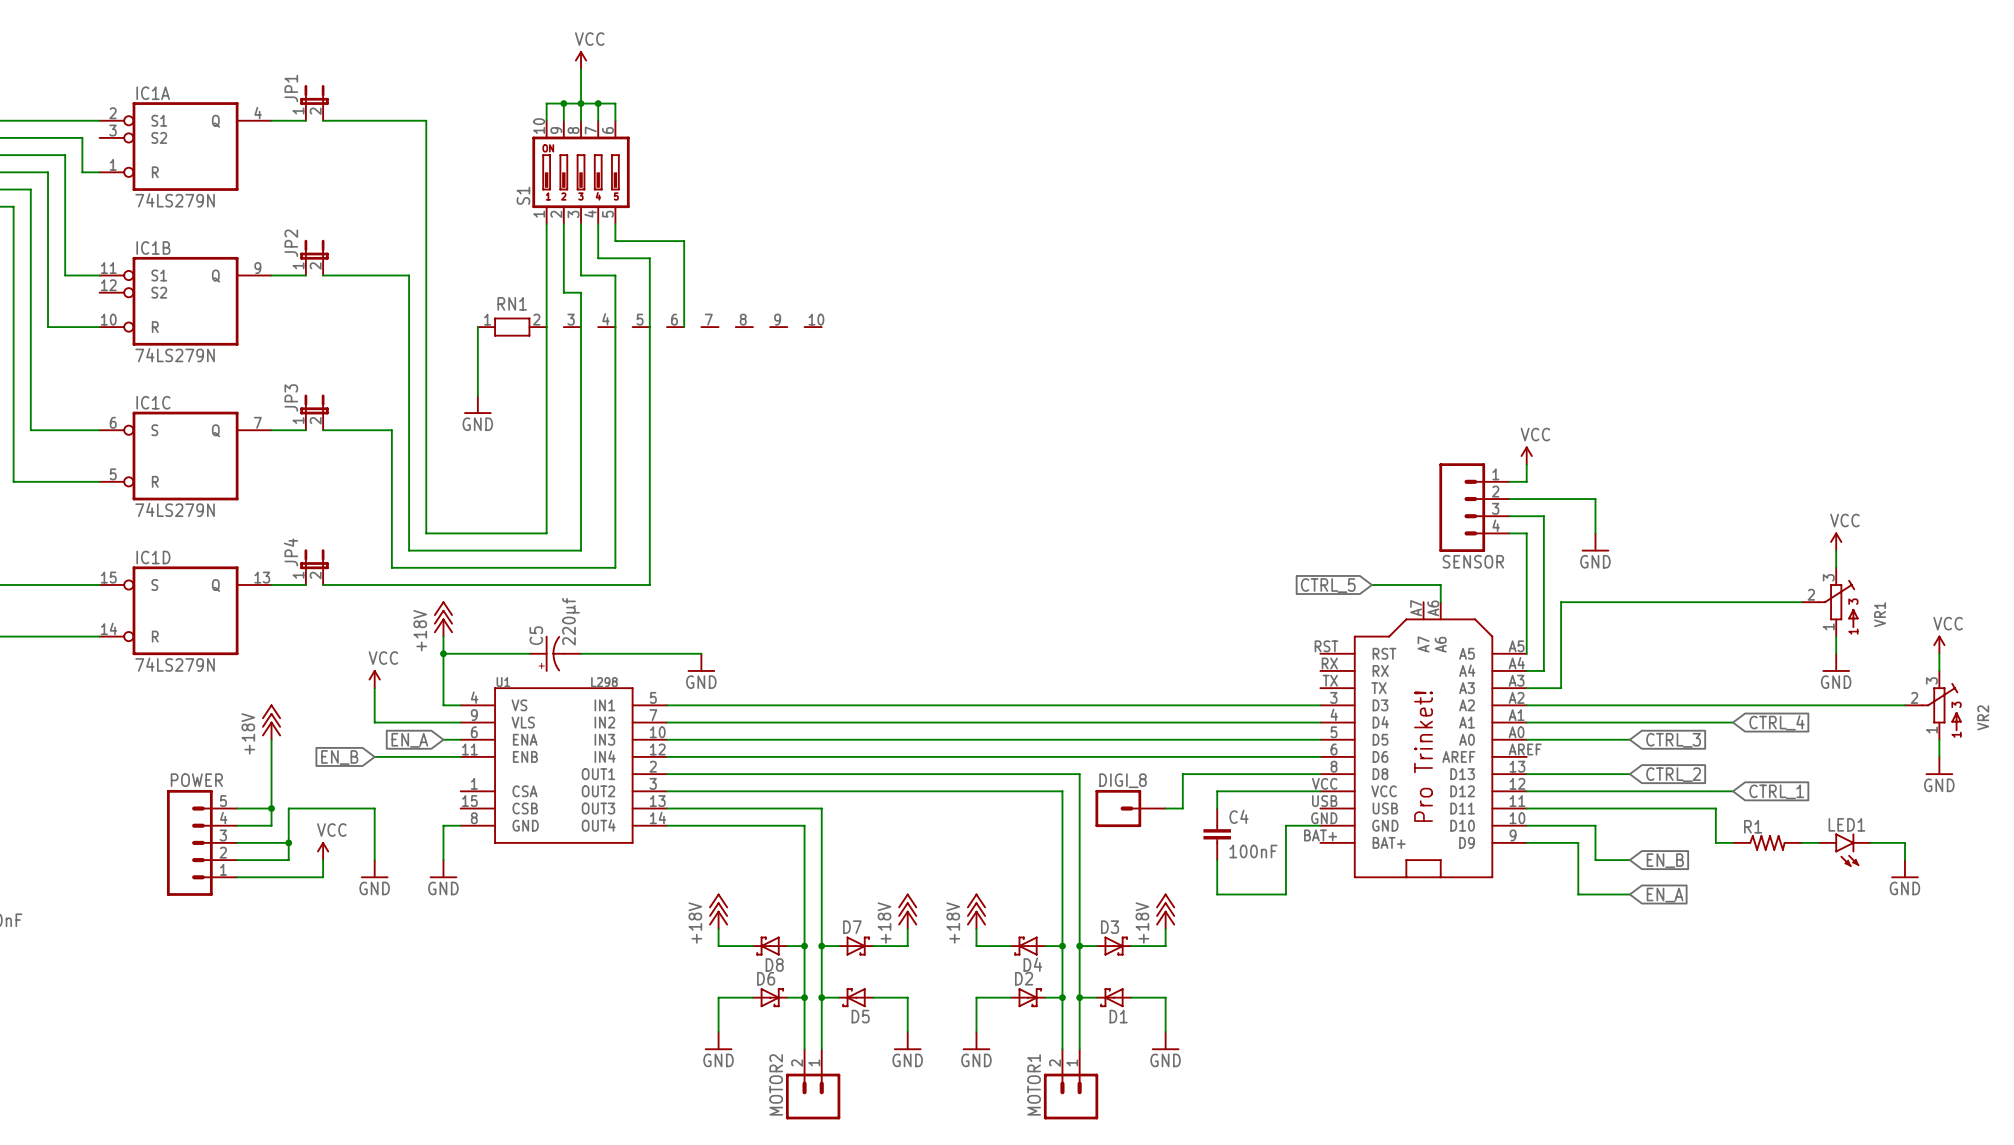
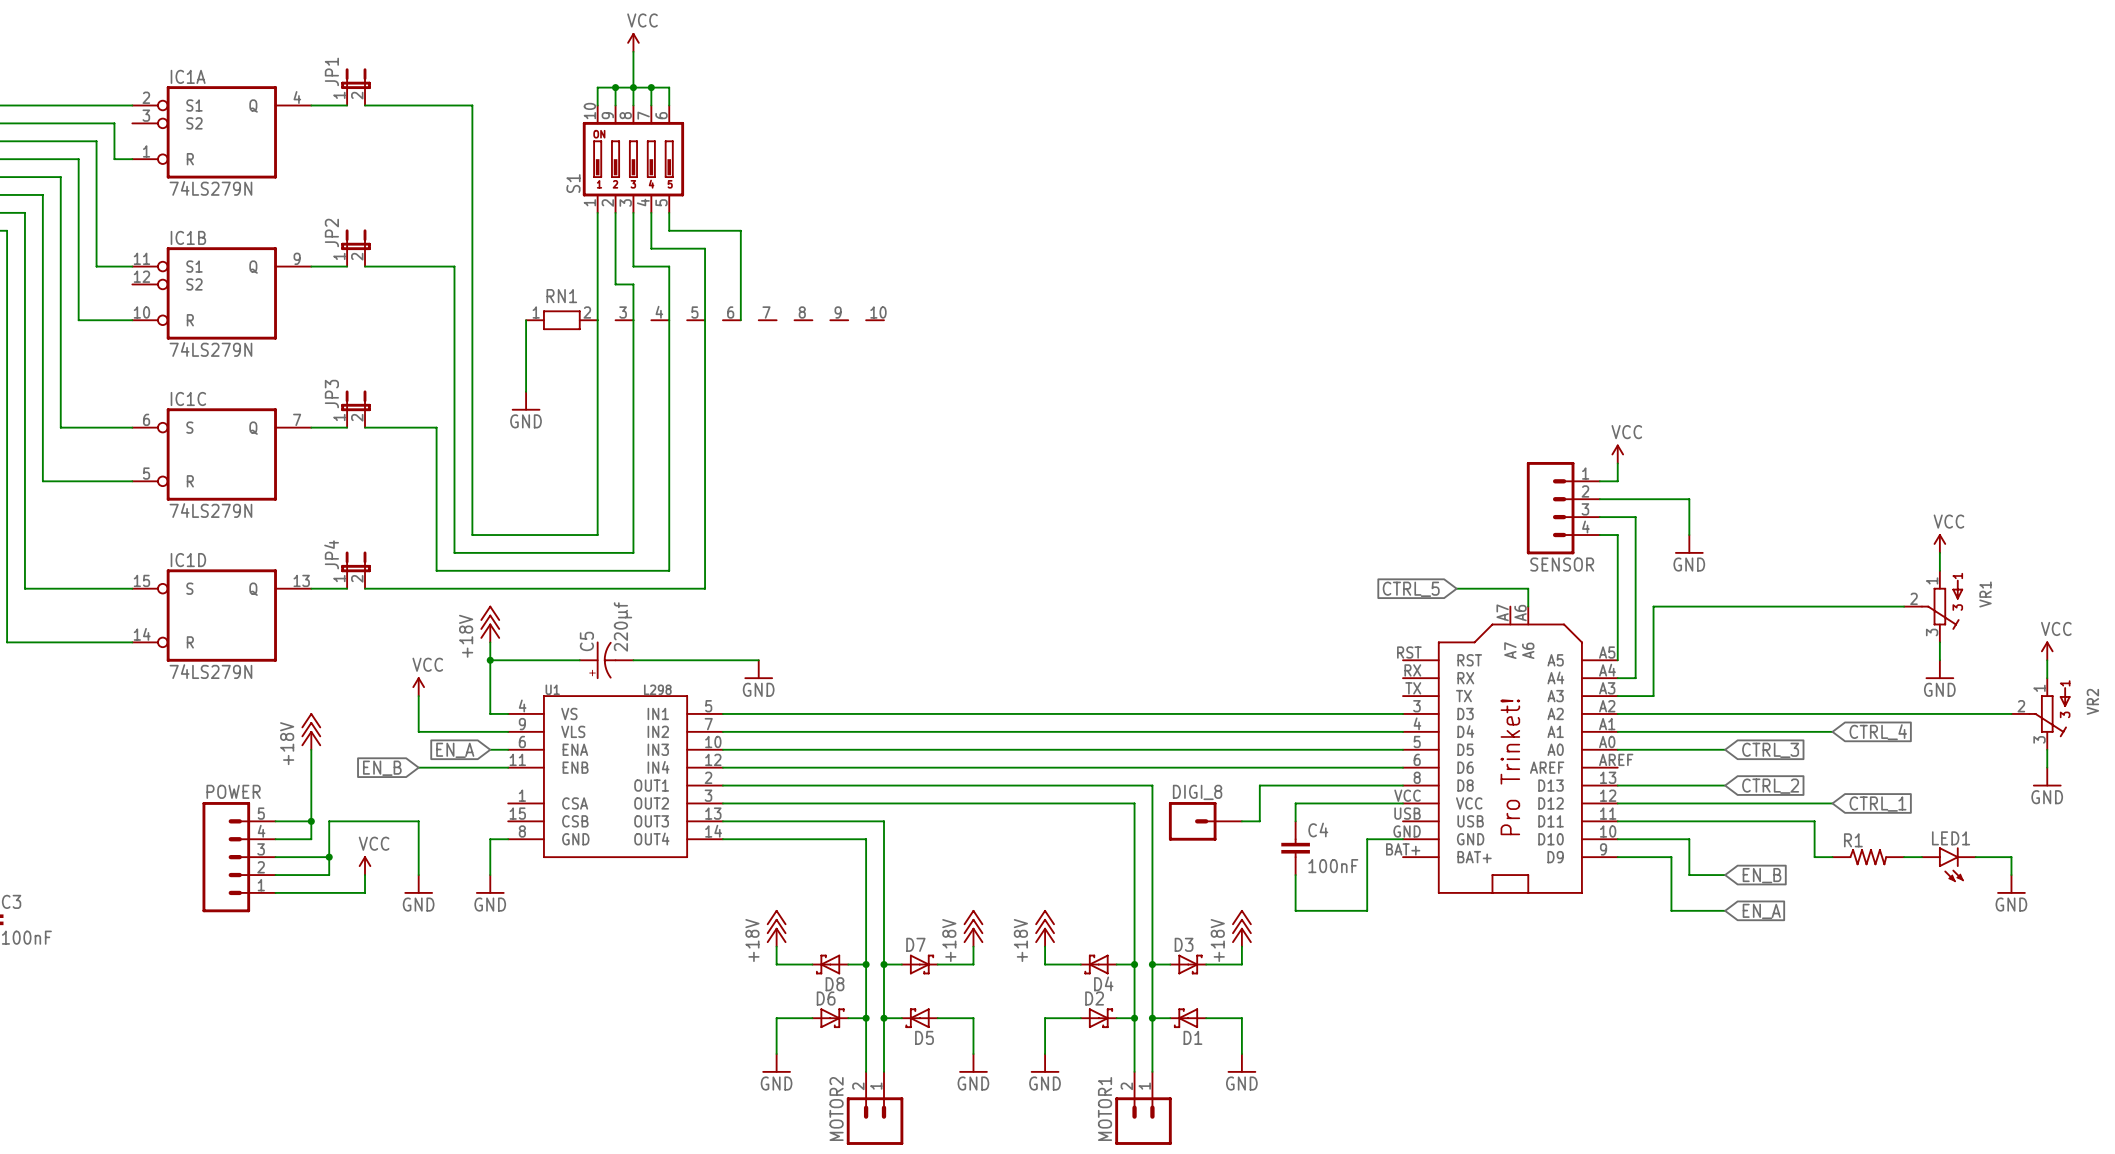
VR1 flip: as is (1838, 603) -> up-down (1942, 604)
VR2 flip: as is (1941, 707) -> up-down (2049, 712)

